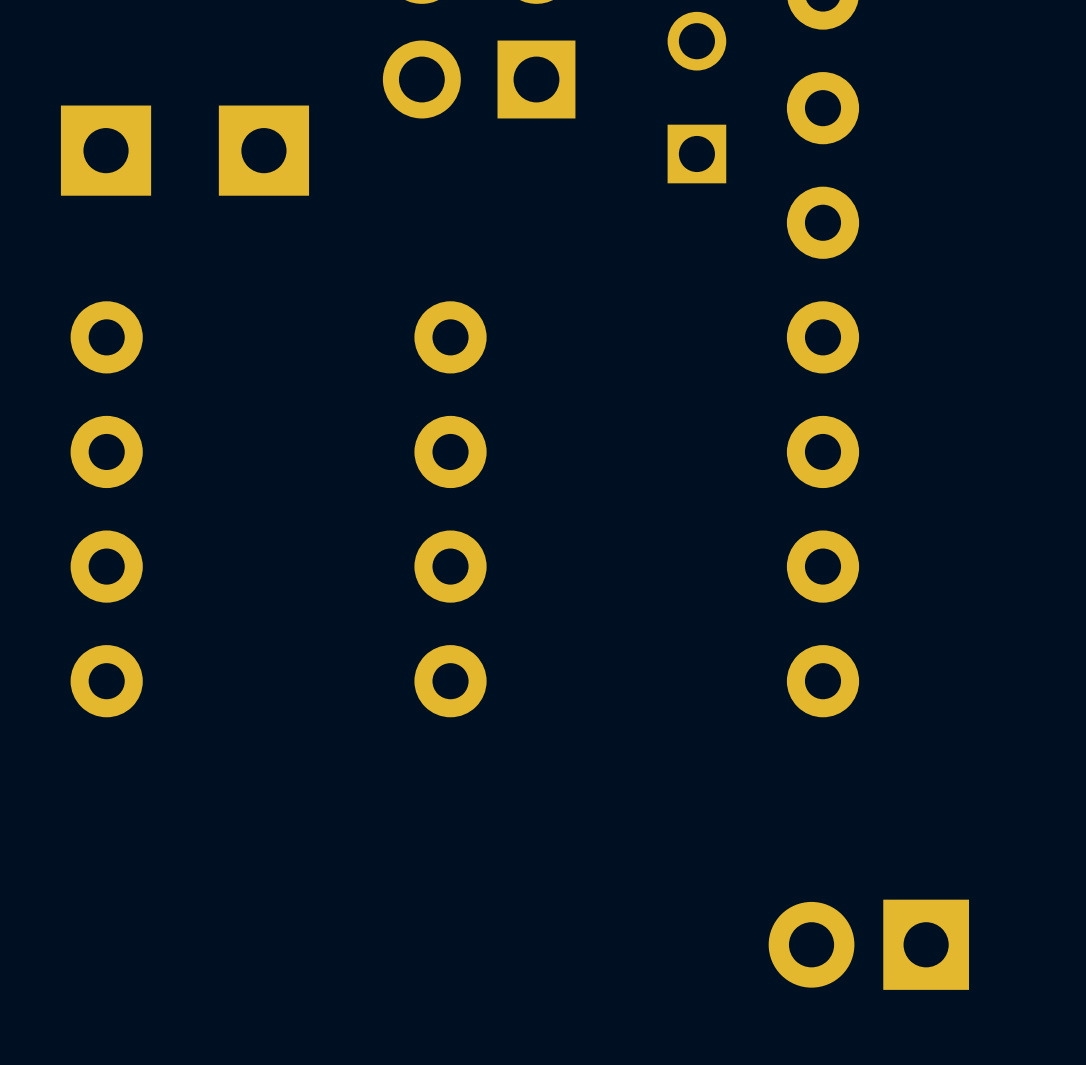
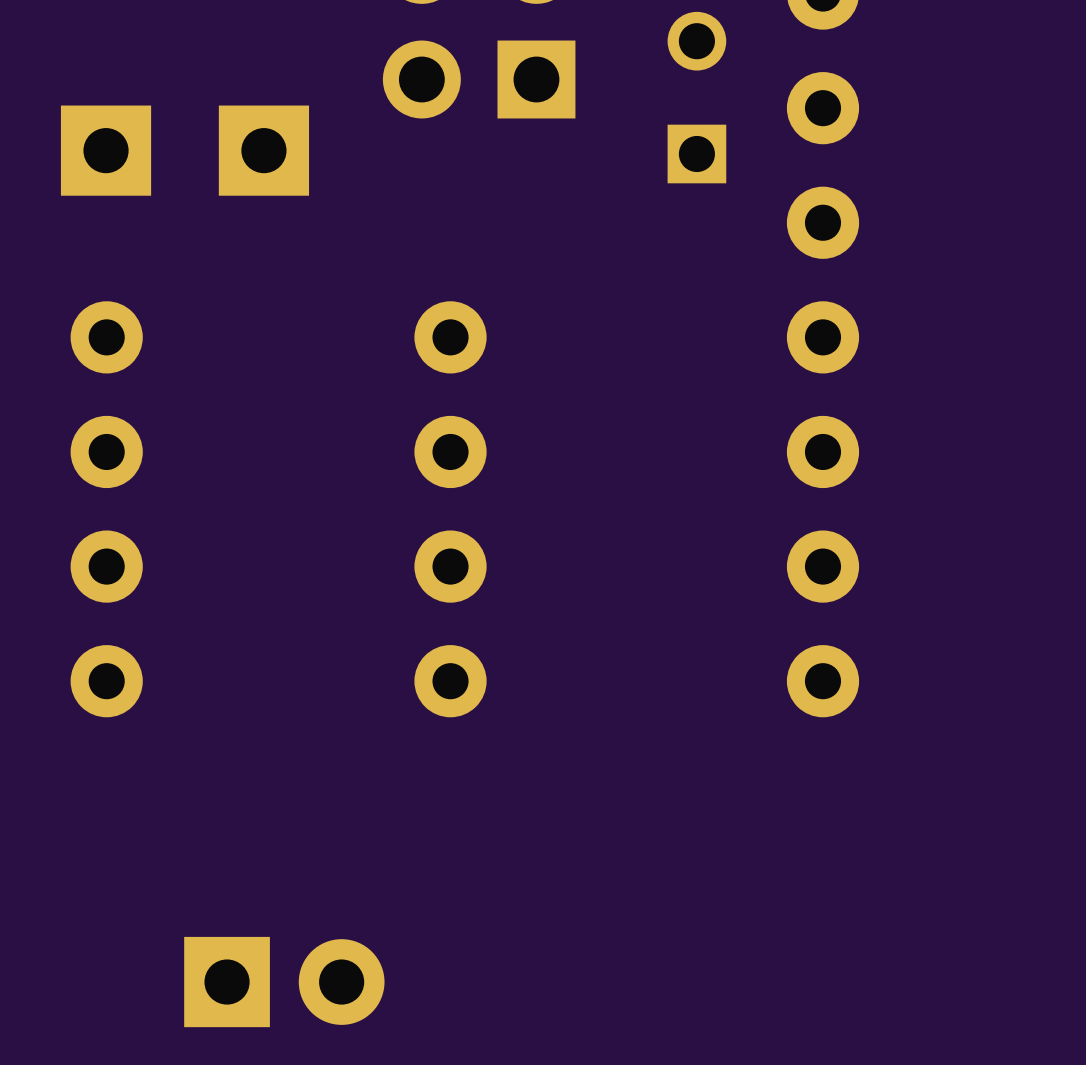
part rotation: 0° (868, 944) -> 180° (284, 982)
part position: (868, 944) -> (284, 982)

